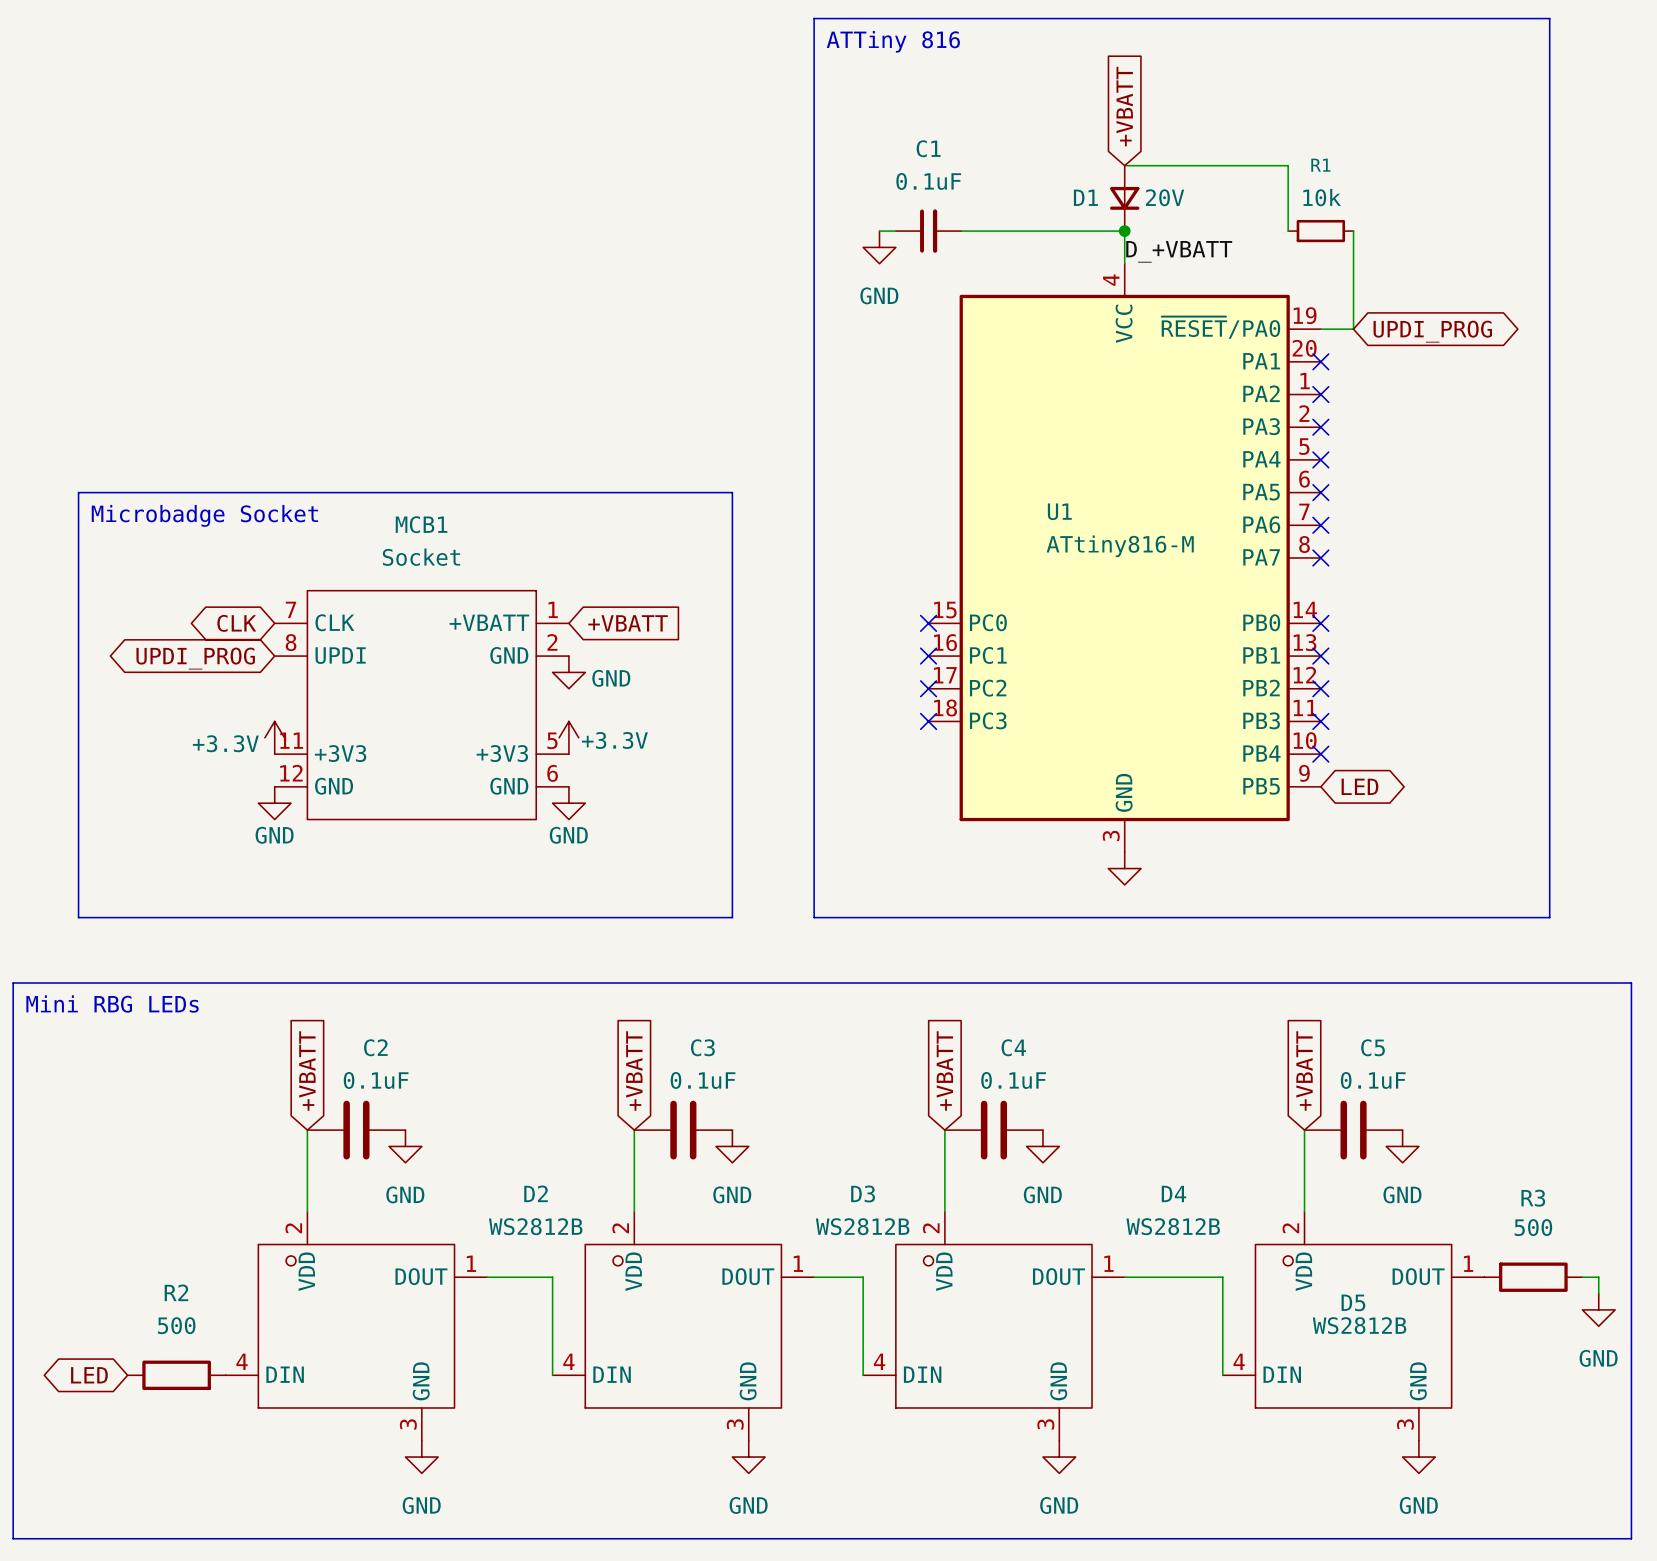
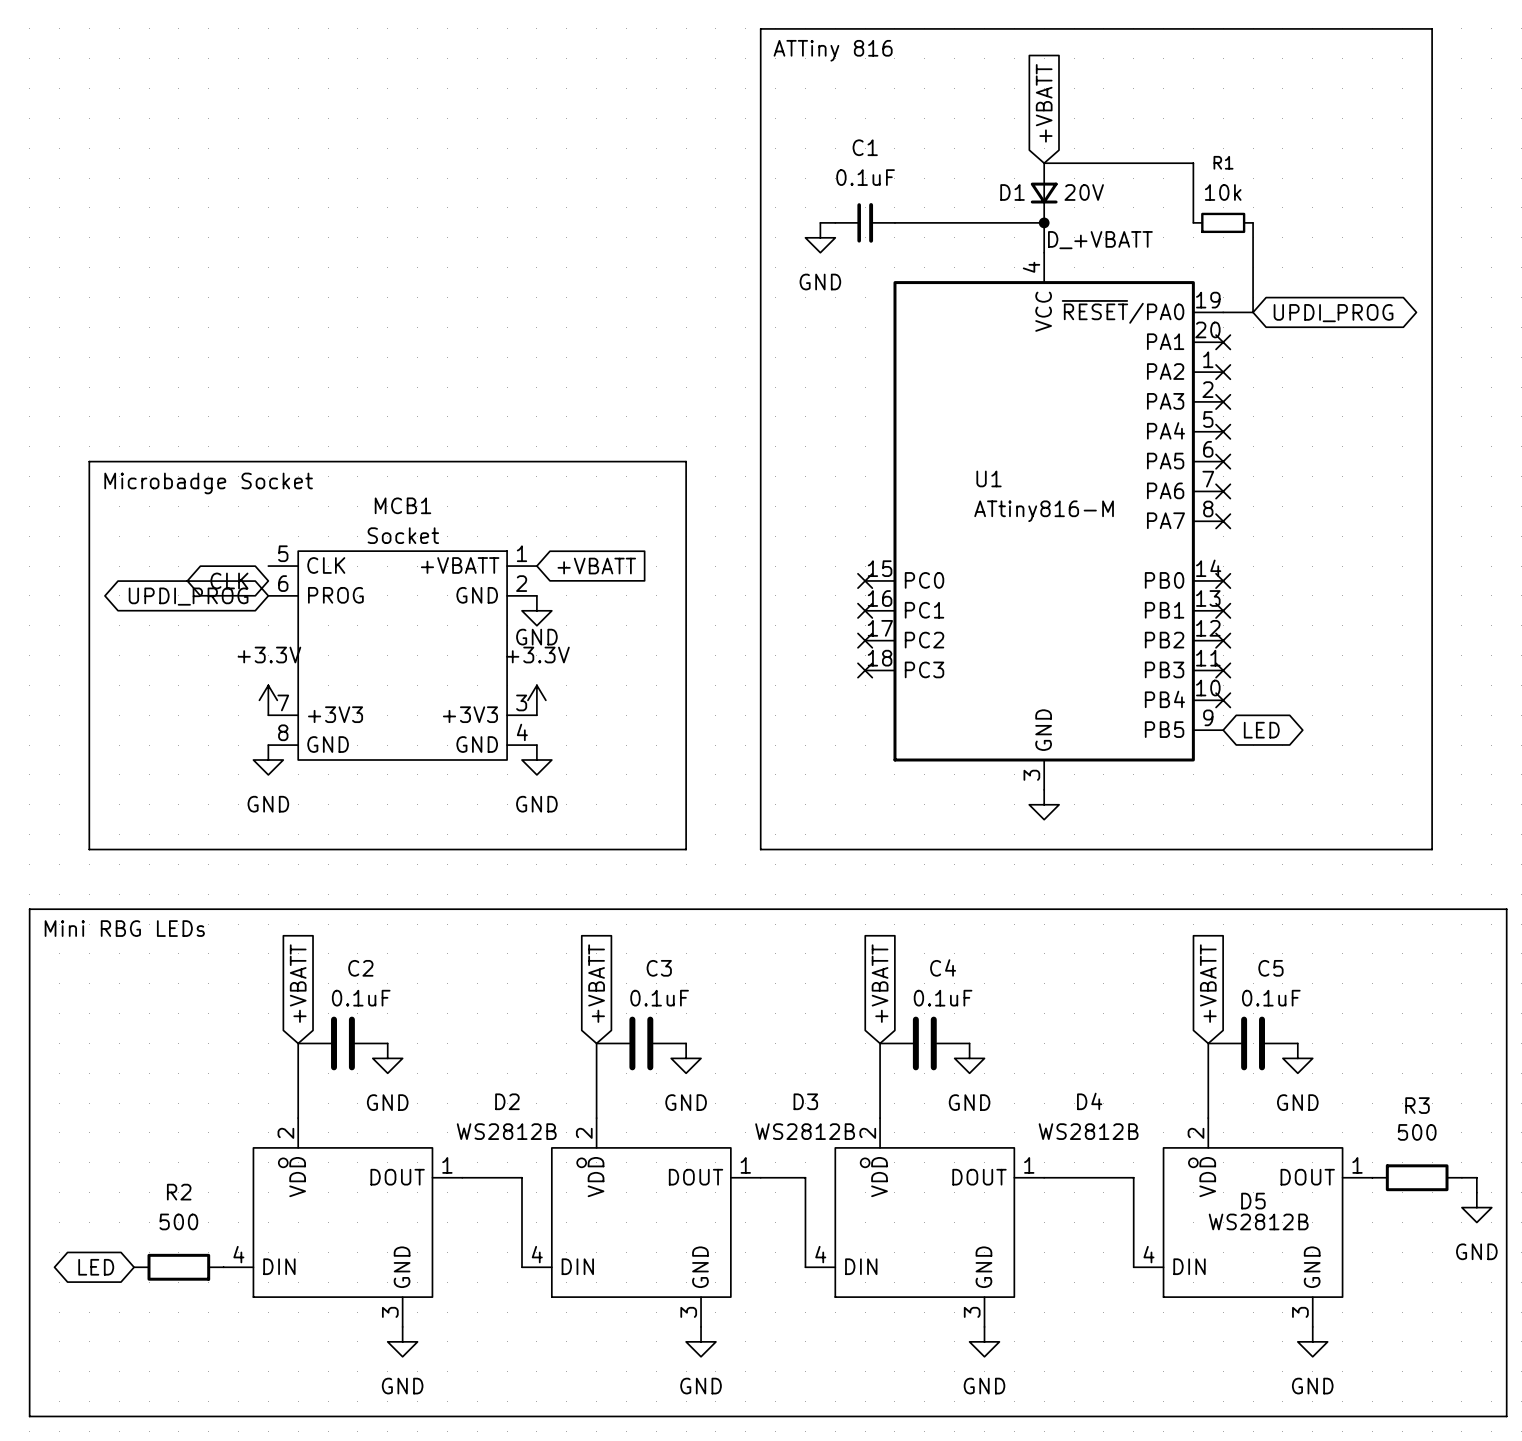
MCB1 symbol: [274, 590, 569, 820] -> [268, 551, 537, 761]
global label position: +VBATT (628, 623) -> +VBATT (596, 566)
global label position: UPDI_PROG (195, 658) -> UPDI_PROG (188, 596)
power symbol position: GND (568, 672) -> GND (536, 610)
power symbol text position: GND (611, 678) -> GND (536, 637)
power symbol position: +3.3V (274, 737) -> +3.3V (268, 700)
power symbol position: +3.3V (568, 737) -> +3.3V (536, 700)
power symbol text position: +3.3V (614, 740) -> +3.3V (537, 655)
power symbol text position: +3.3V (225, 743) -> +3.3V (269, 655)
power symbol position: GND (274, 803) -> GND (268, 760)
power symbol position: GND (568, 803) -> GND (536, 760)
power symbol text position: GND (274, 835) -> GND (268, 804)
power symbol text position: GND (568, 835) -> GND (536, 804)

